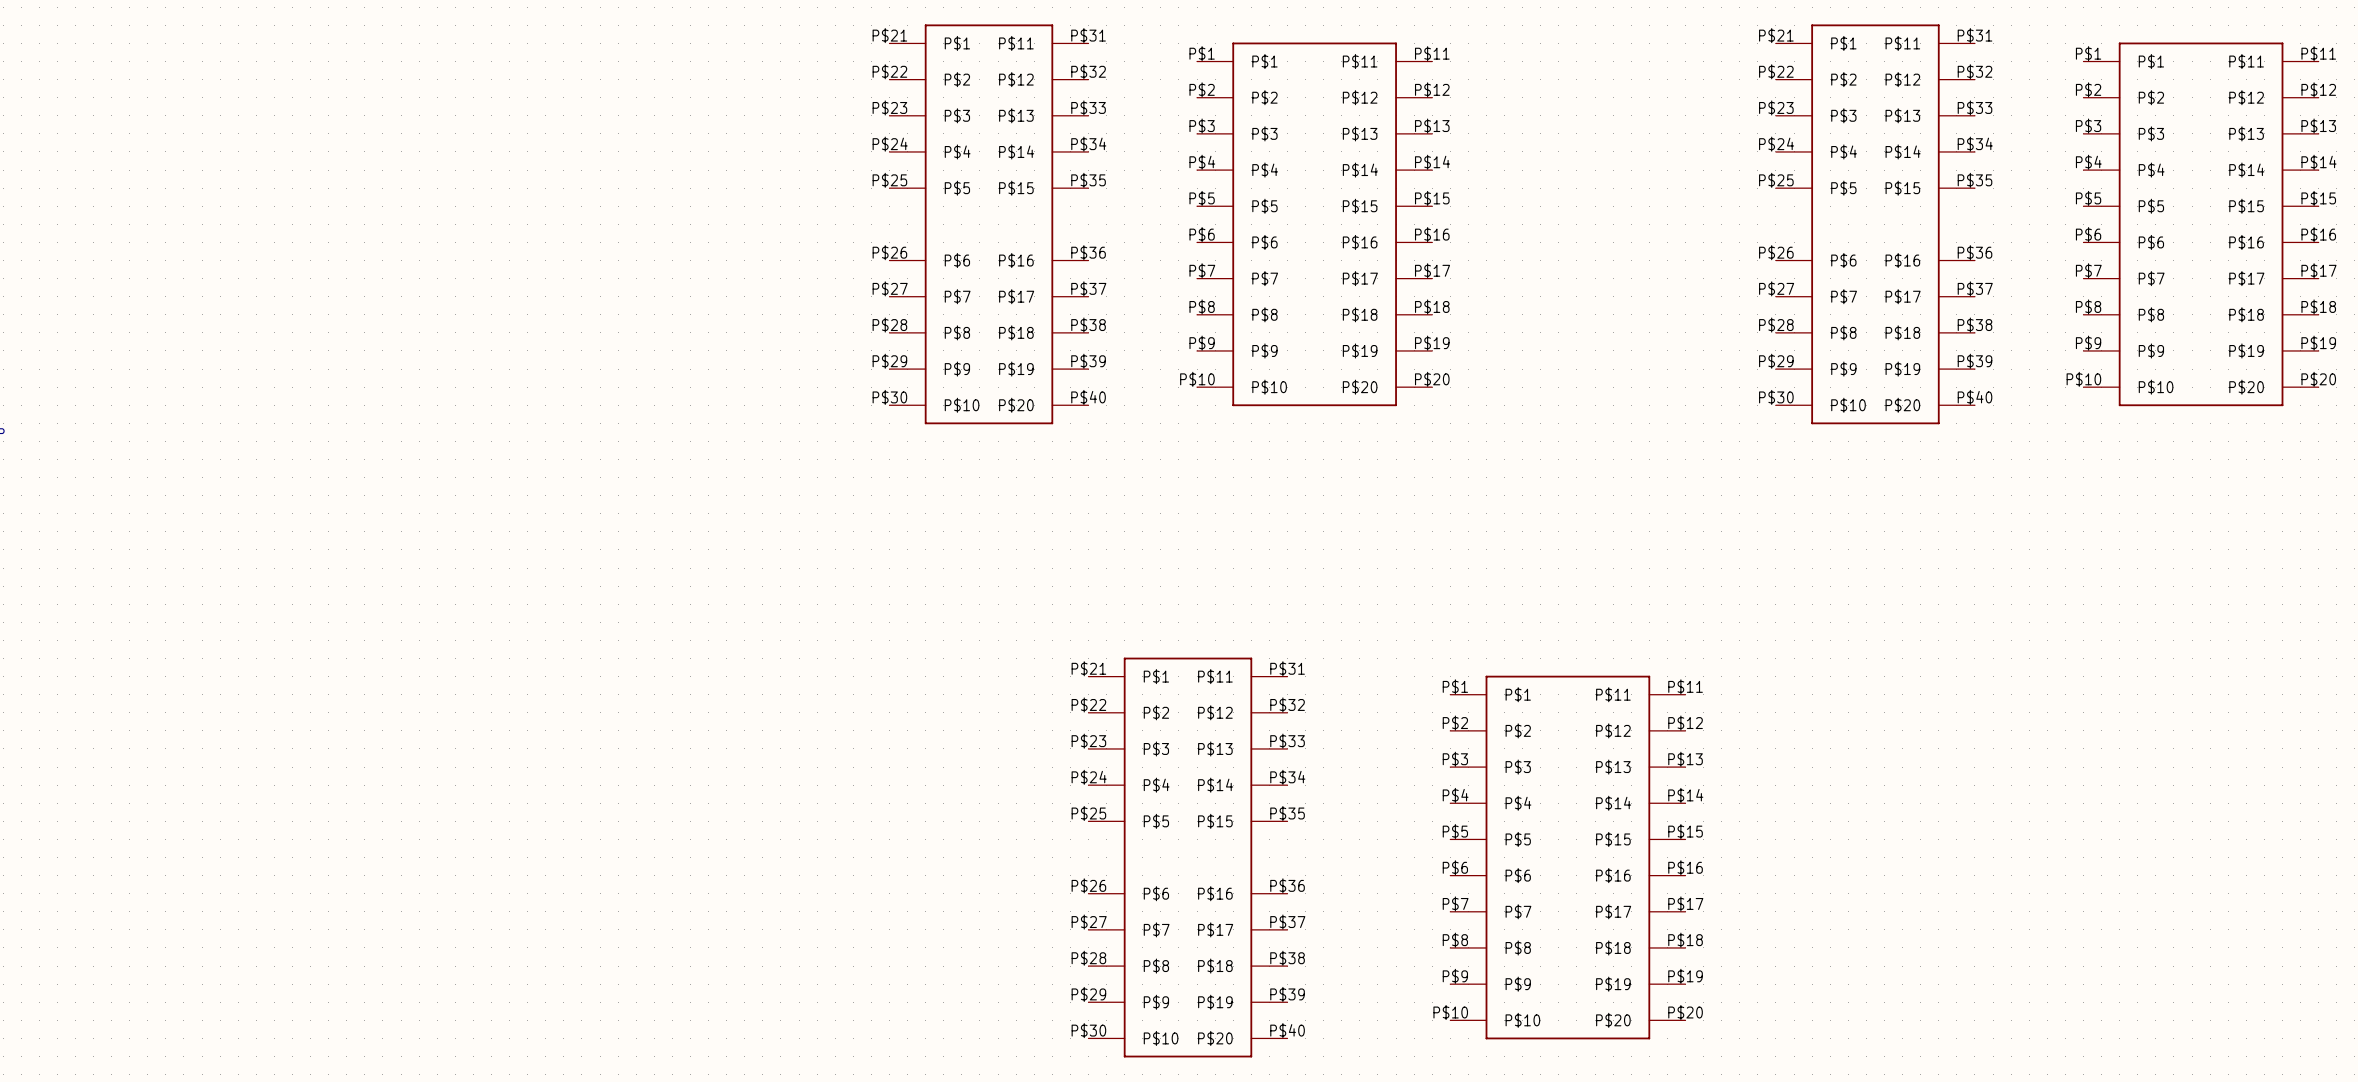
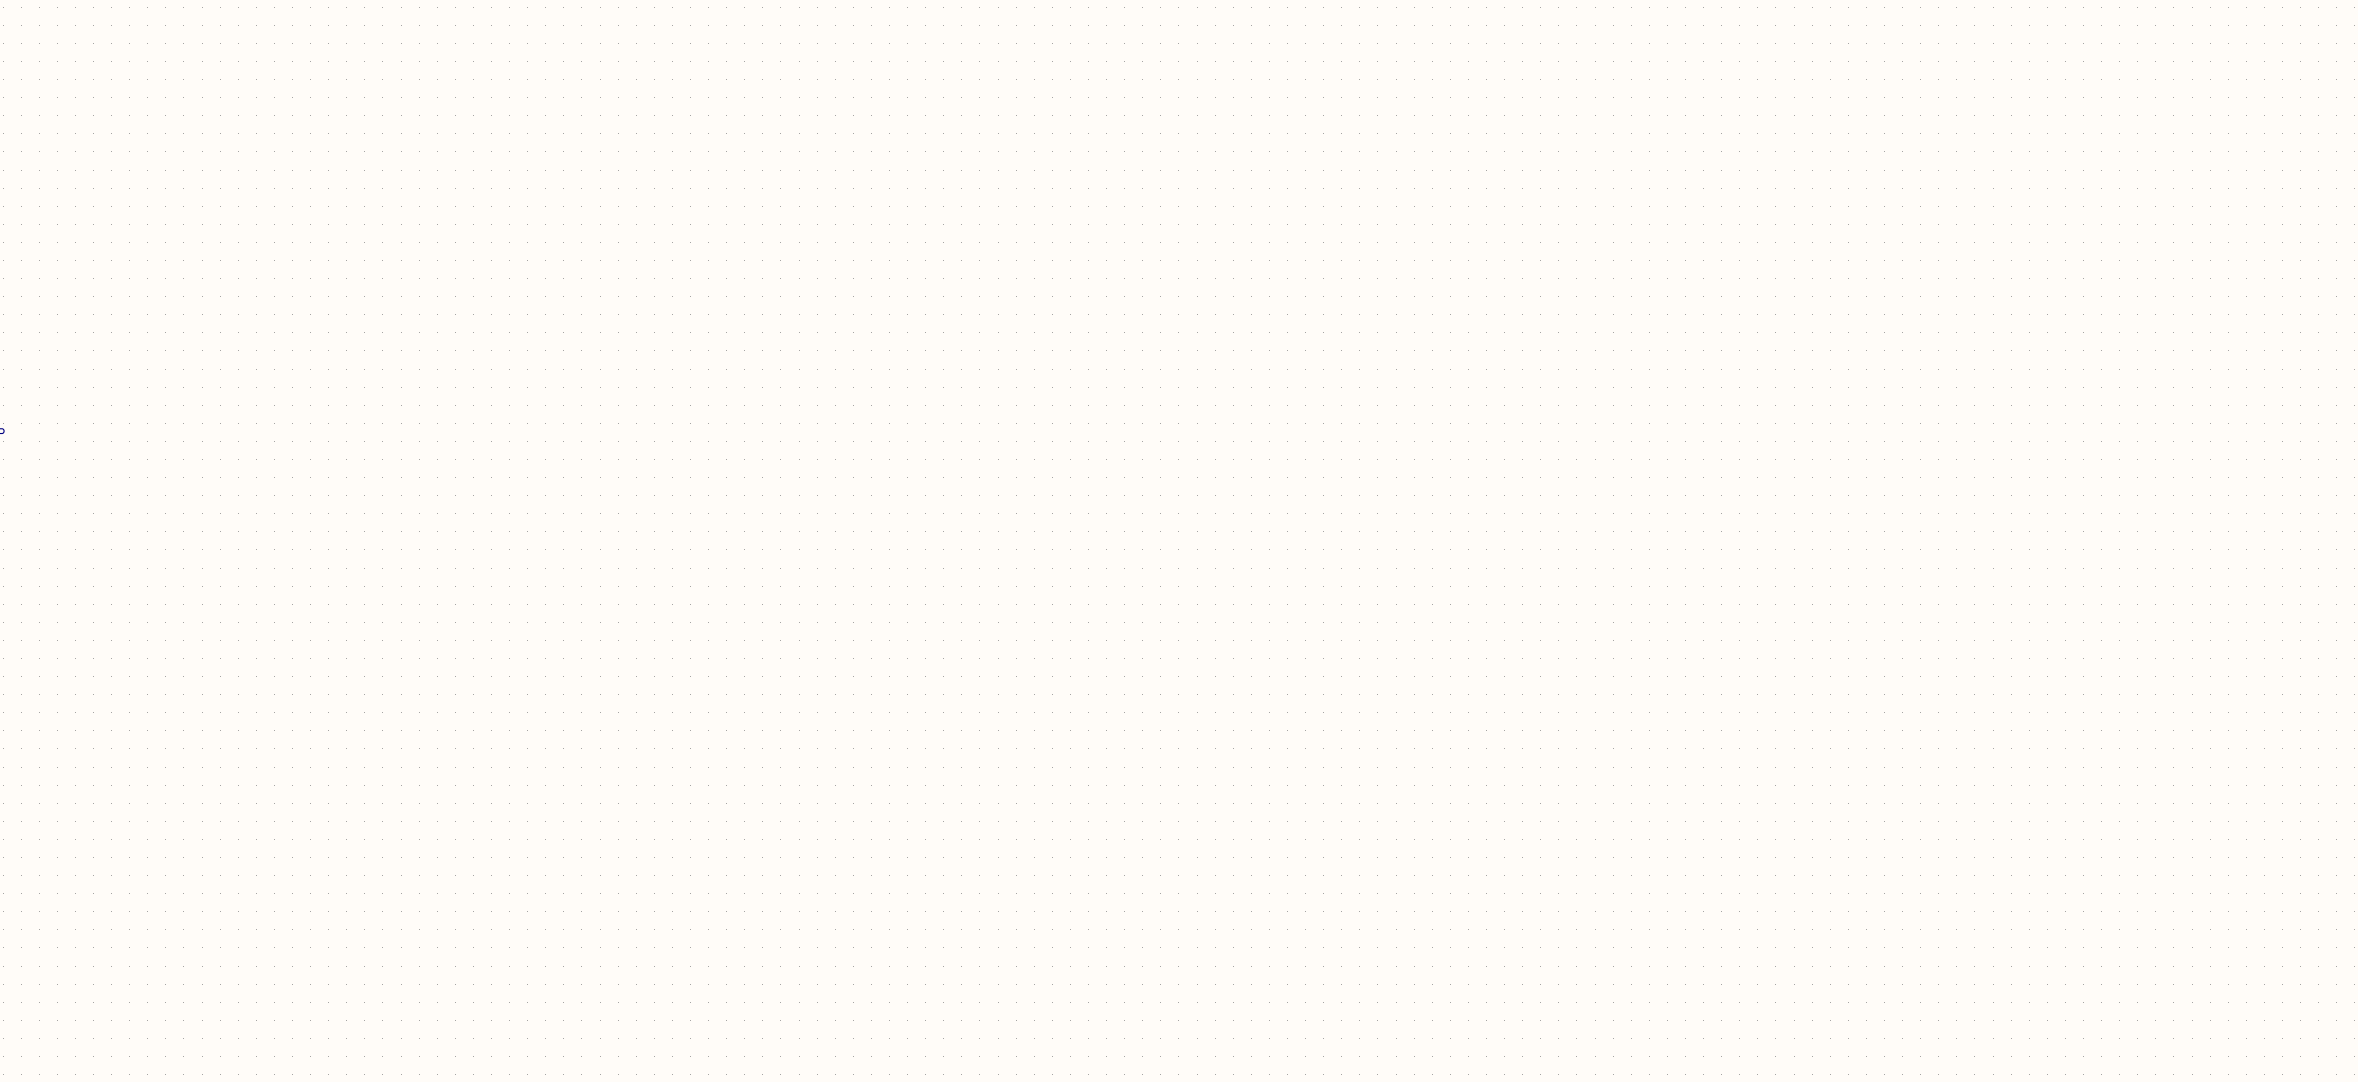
part: (988, 224) -> none
part: (1314, 224) -> none
part: (1875, 224) -> none
part: (2201, 224) -> none
part: (1187, 857) -> none
part: (1567, 857) -> none

